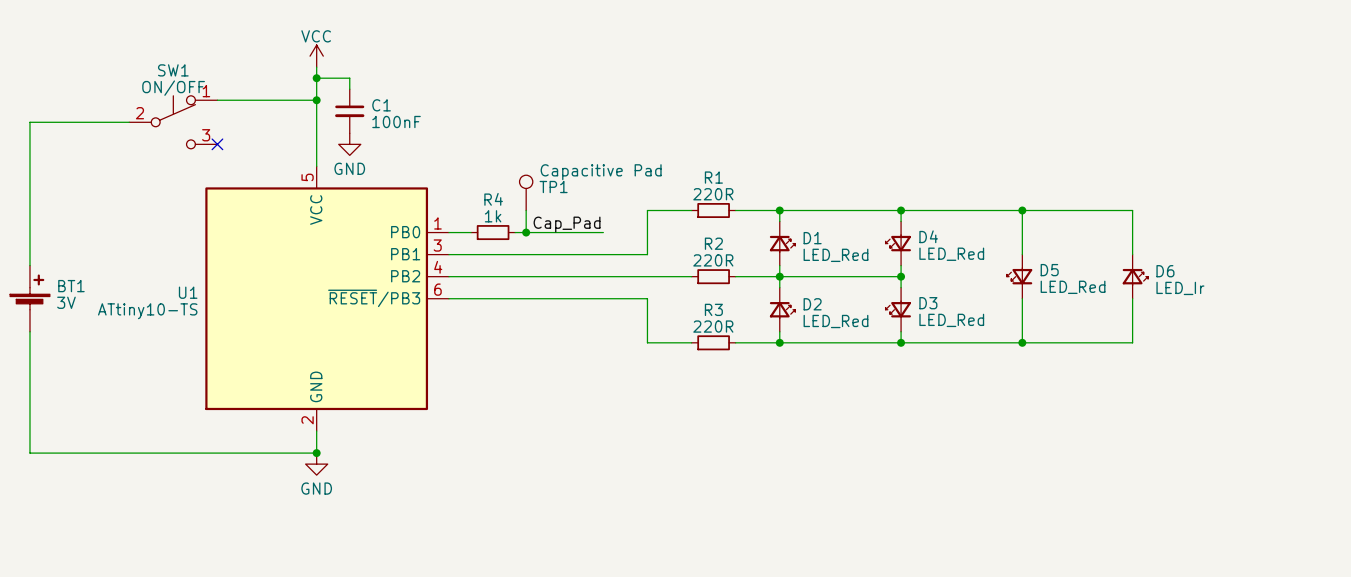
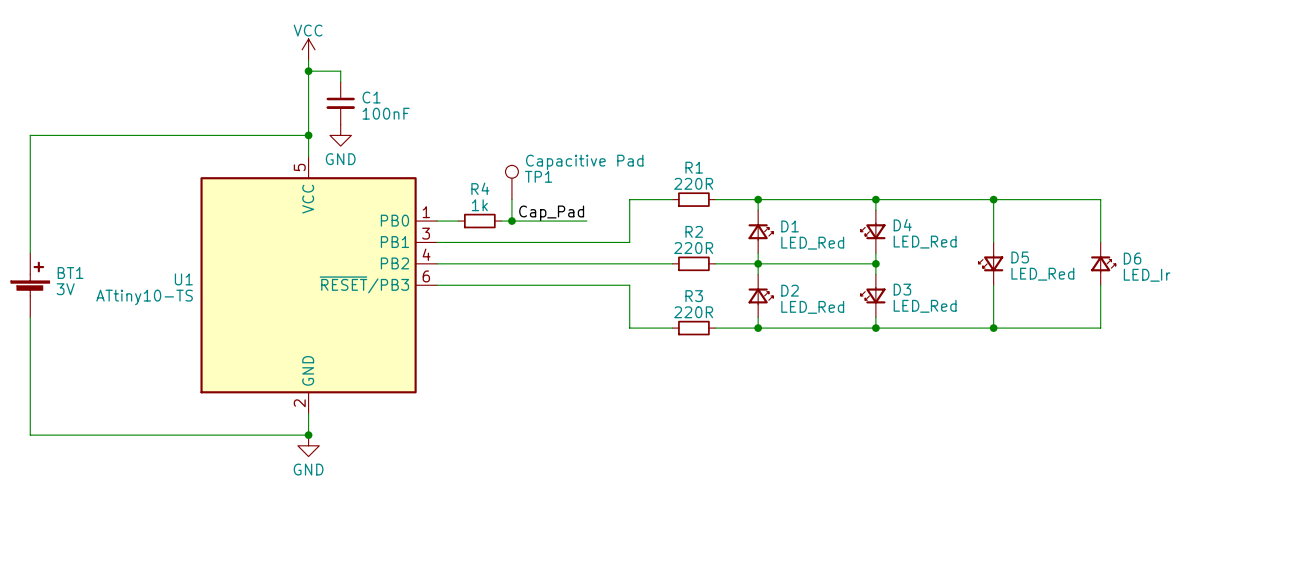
wire: (217, 100) (316, 100) -> none
junction position: (316, 100) -> (308, 135)
wire: (129, 122) (29, 122) (29, 144) -> (308, 135) (30, 135)
SW1: ON/OFF (173, 122) -> none
no-connect mark: (217, 144) -> none

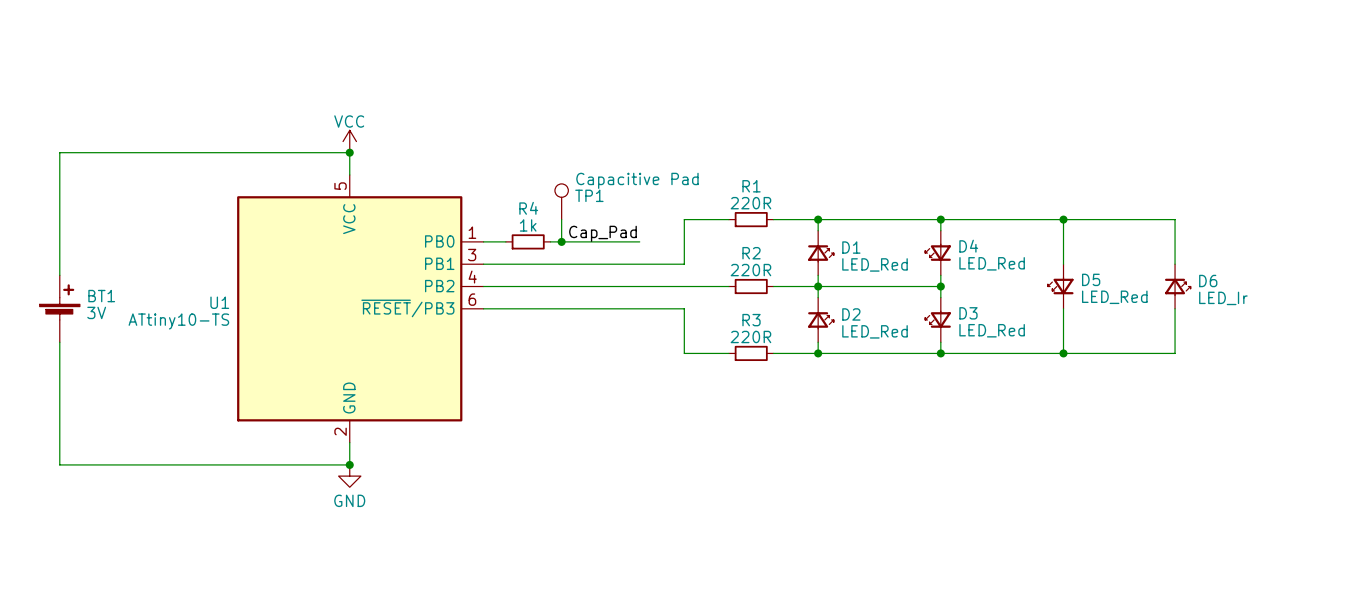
power symbol position: VCC (308, 49) -> VCC (349, 141)
wire: (308, 60) (308, 135) -> none
wire: (308, 71) (340, 71) (340, 81) -> none
junction: (308, 71) -> none
C1: 100nF (340, 103) -> none
power symbol: GND (340, 135) -> none

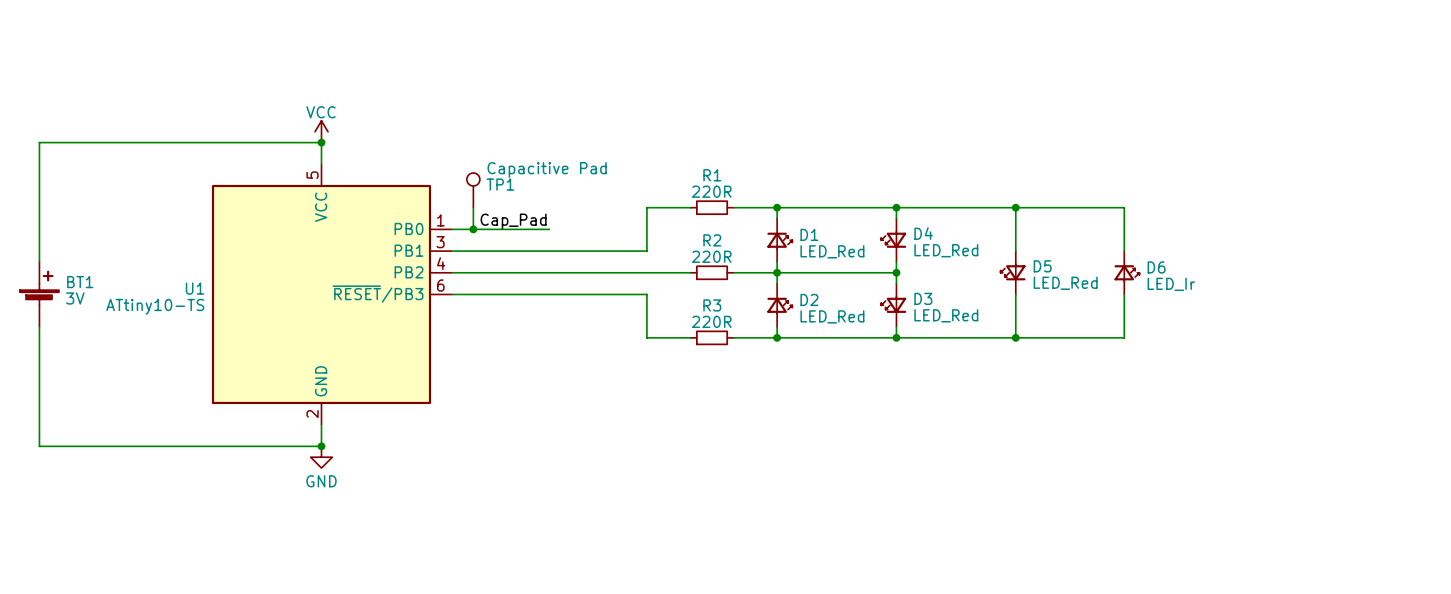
TP1 position: (561, 201) -> (473, 190)
wire: none -> (473, 207) (473, 229) (516, 229)
wire: (561, 219) (561, 241) -> none
label position: Cap_Pad (602, 233) -> Cap_Pad (513, 221)
junction: none -> (473, 229)
R4: 1k (528, 241) -> none
junction: (561, 241) -> none
wire: (583, 241) (639, 241) -> none

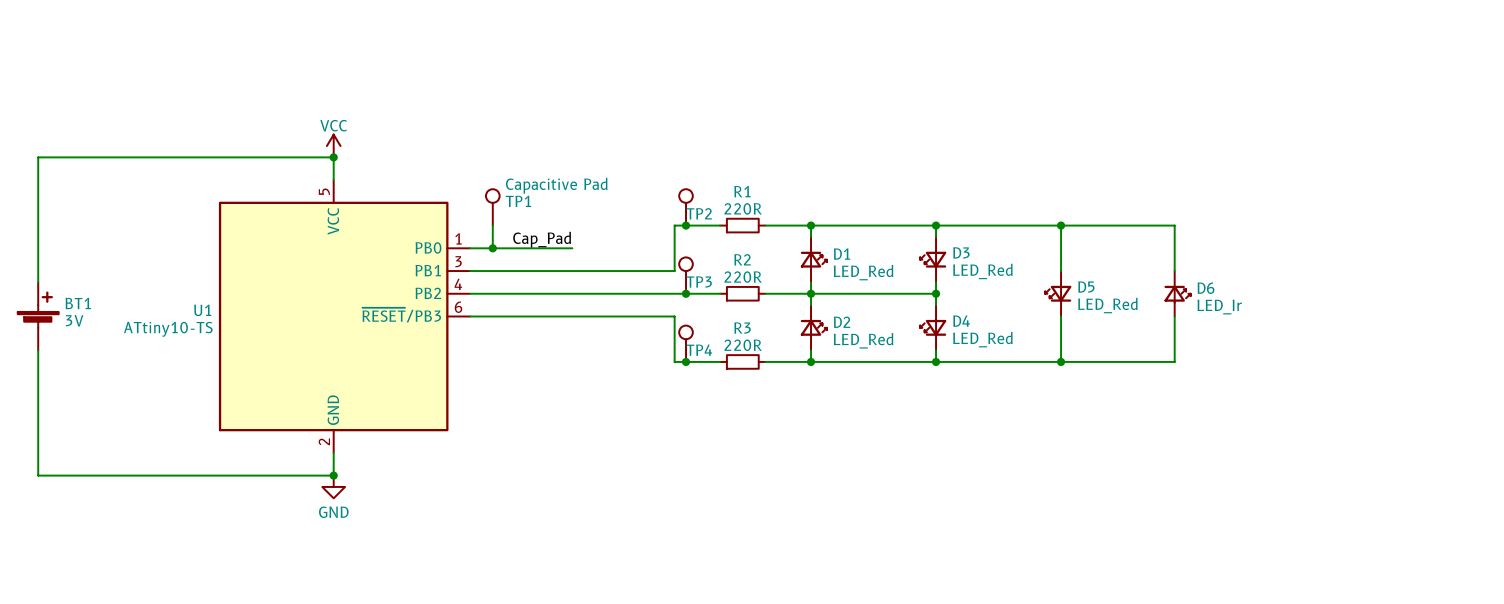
TP2: none -> (686, 207)
junction: none -> (686, 225)
D4 name: D4 (923, 233) -> D3 (961, 252)
TP3: none -> (686, 275)
junction: none -> (686, 293)
D3 name: D3 (923, 298) -> D4 (961, 321)
TP4: none -> (686, 343)
junction: none -> (686, 361)

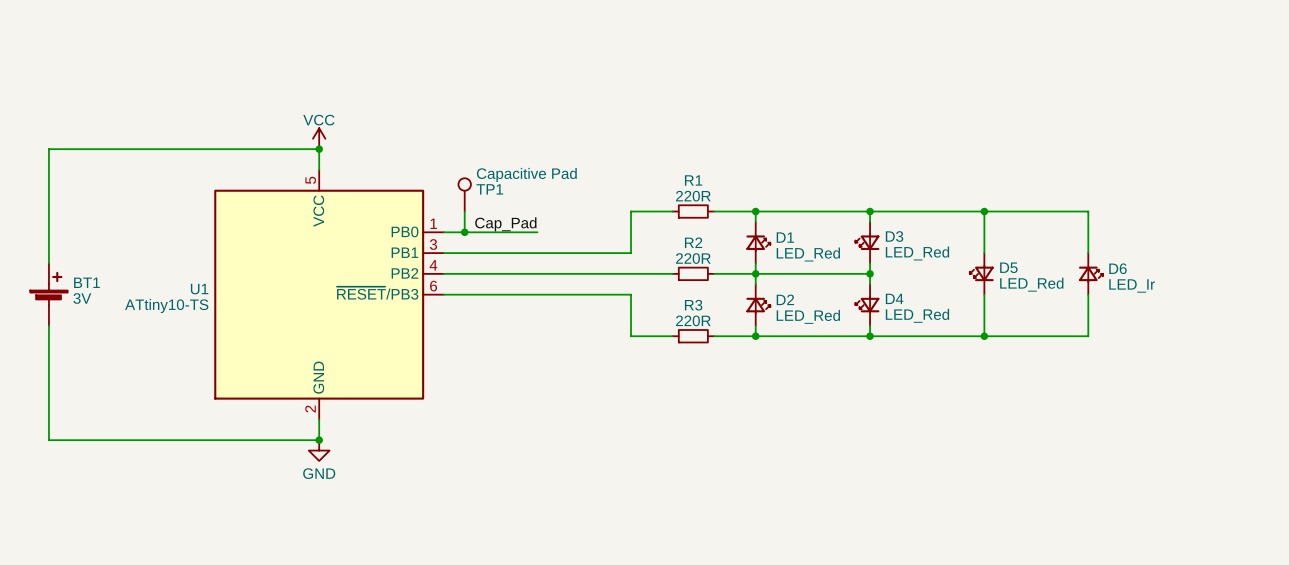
TP2: (686, 207) -> none
junction: (686, 225) -> none
TP3: (686, 275) -> none
junction: (686, 293) -> none
TP4: (686, 343) -> none
junction: (686, 361) -> none

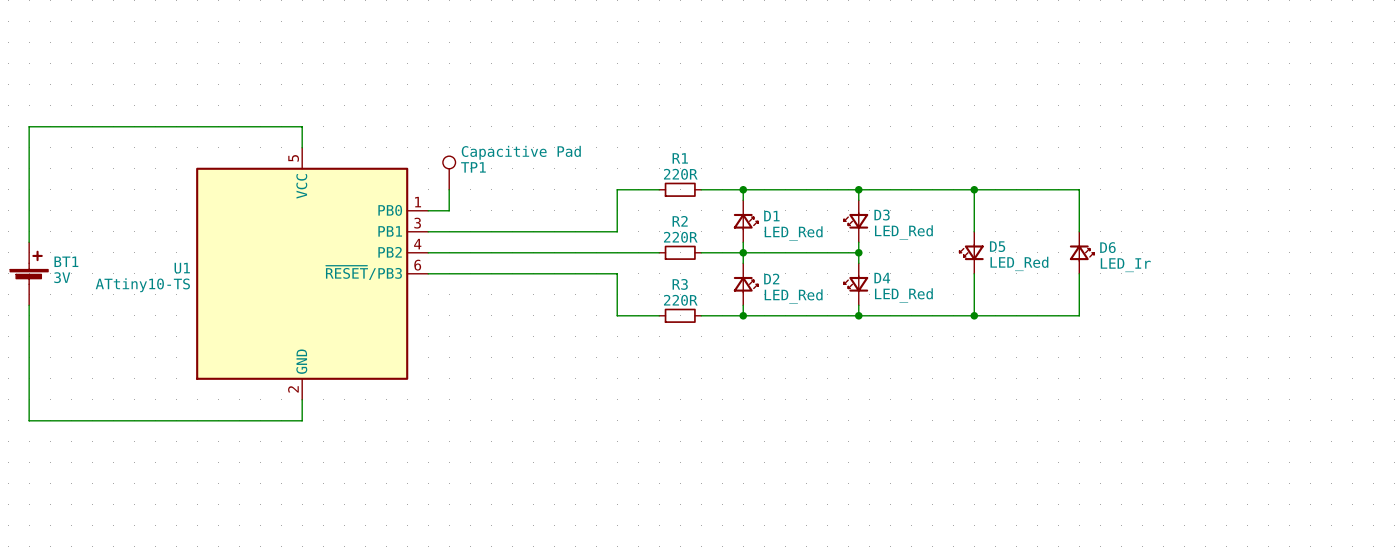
power symbol: VCC (319, 138) -> none
junction: (319, 149) -> none
label: Cap_Pad (505, 224) -> none
wire: (464, 232) (537, 232) -> none
junction: (464, 232) -> none
junction: (319, 440) -> none
power symbol: GND (319, 450) -> none

